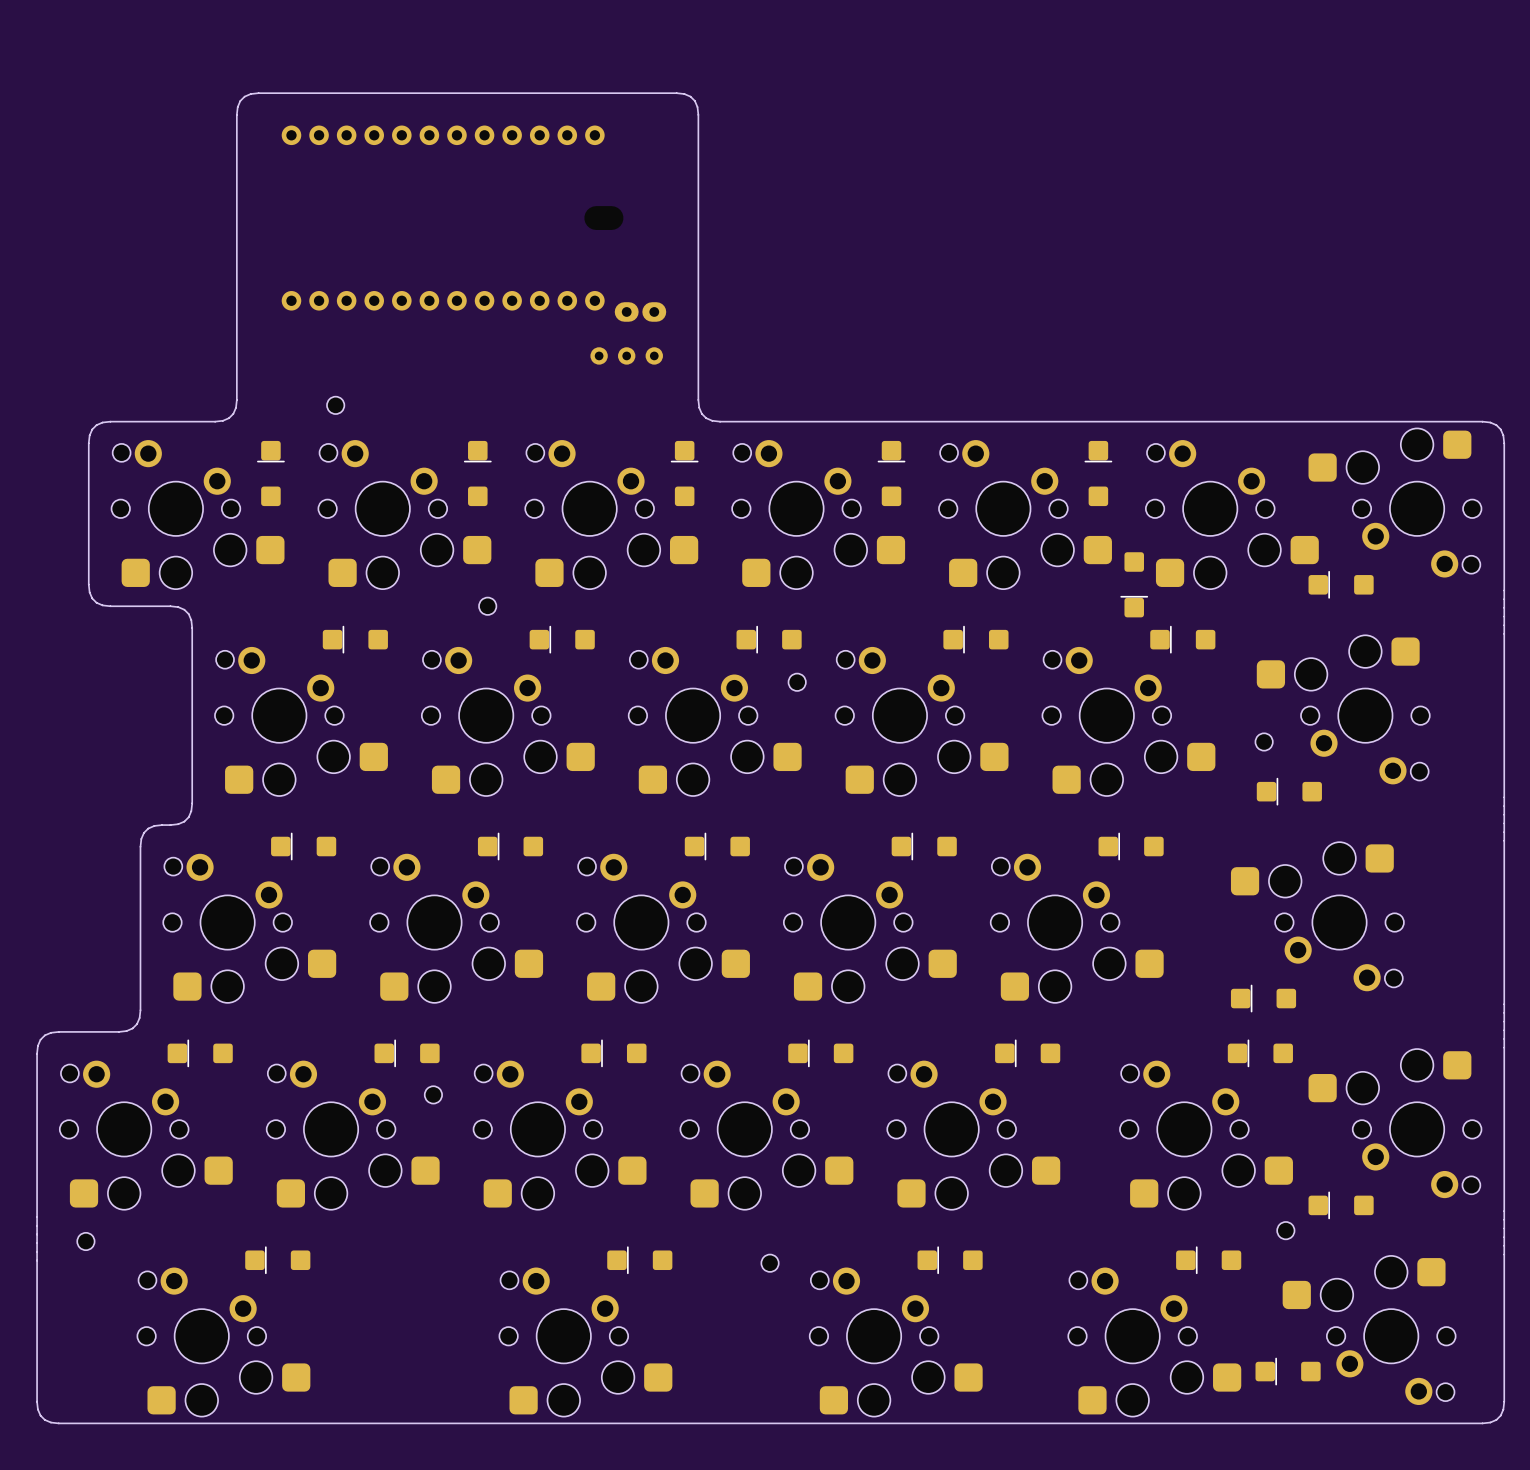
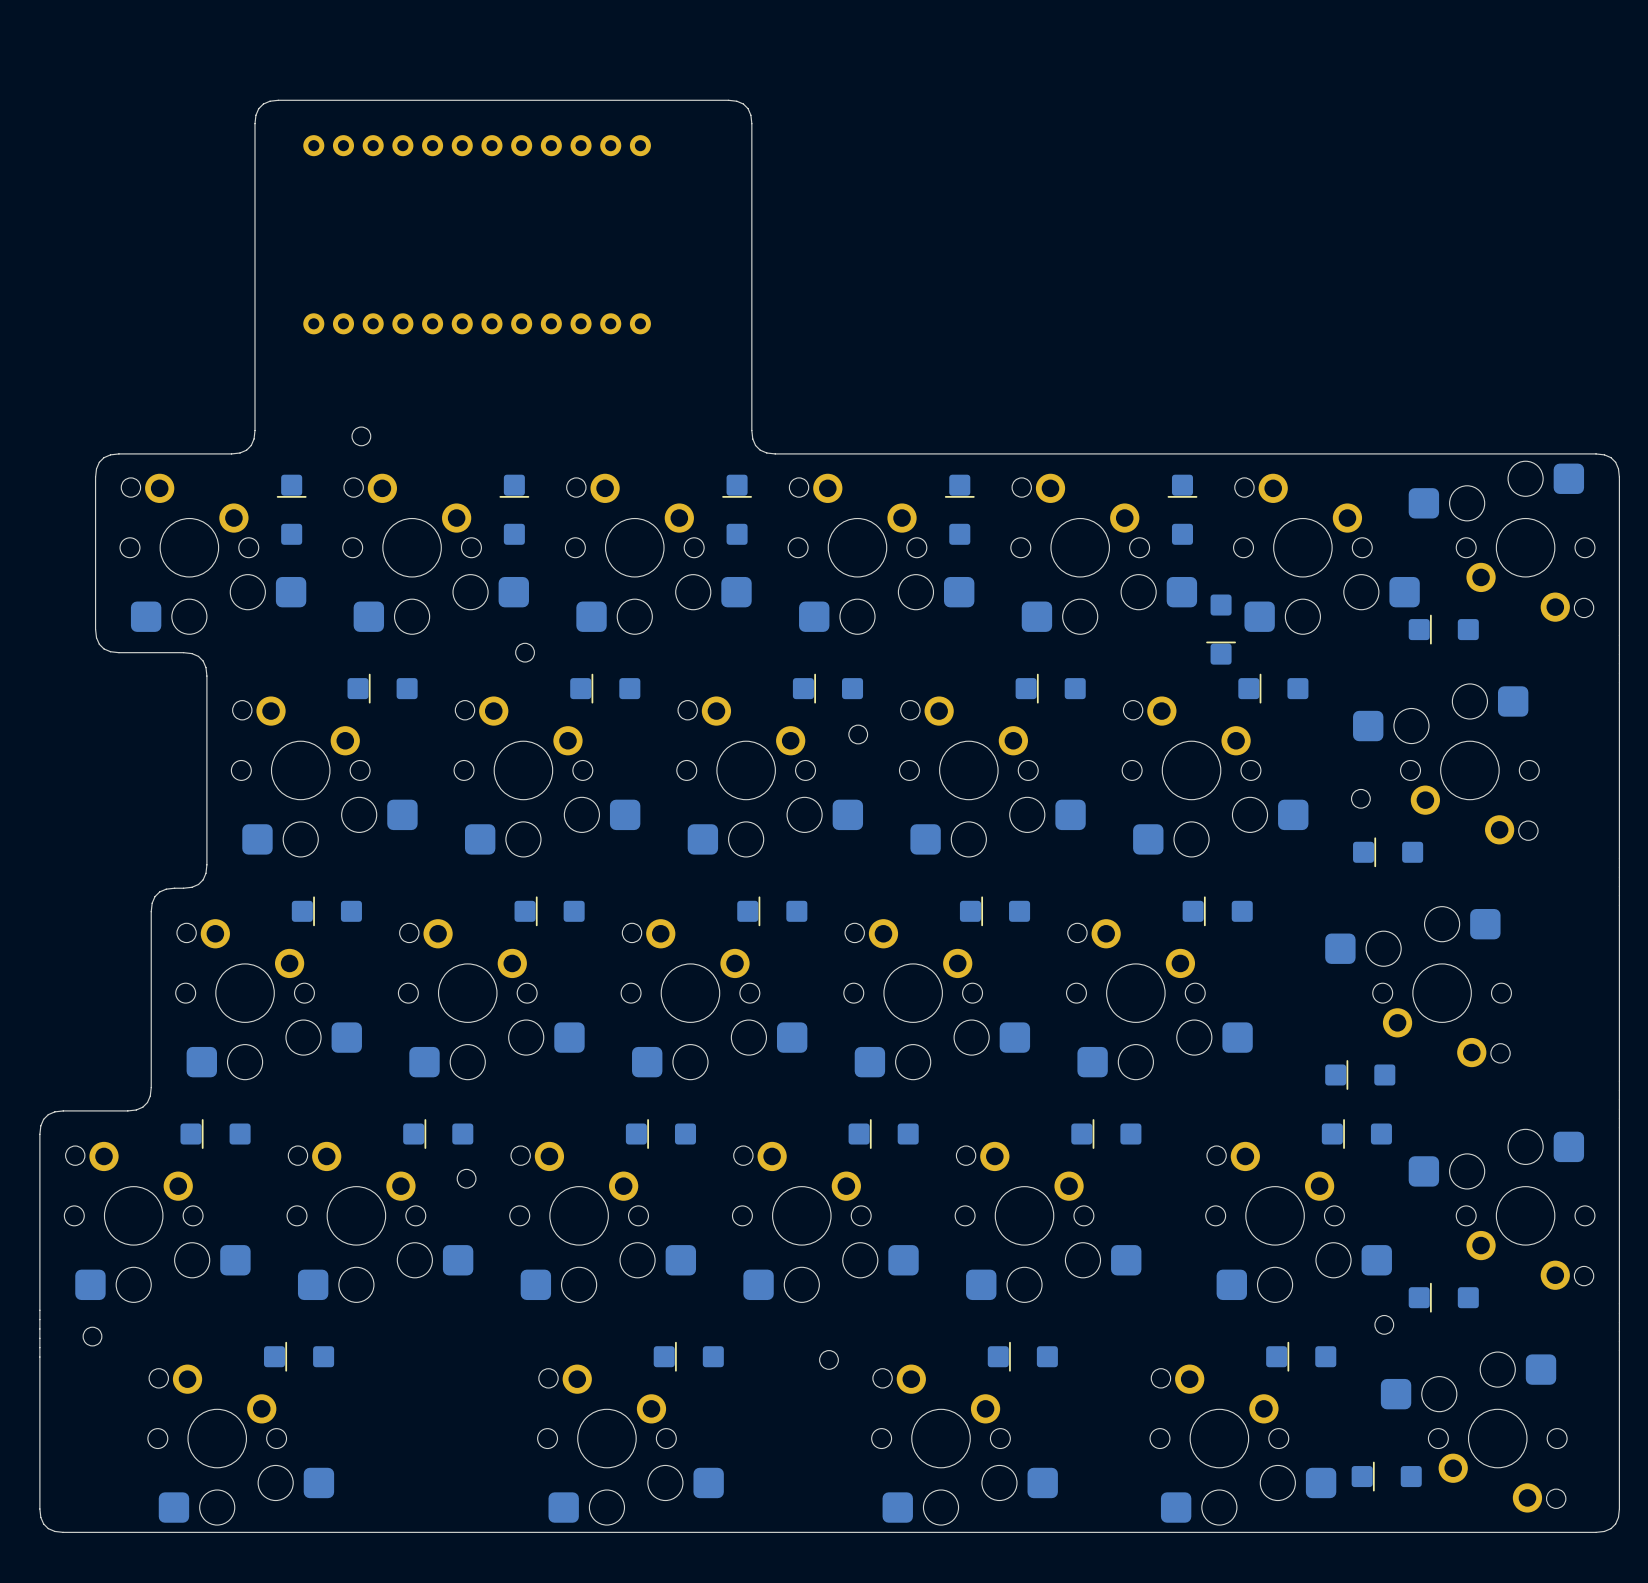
part: (640, 311) -> none
part: (626, 355) -> none

